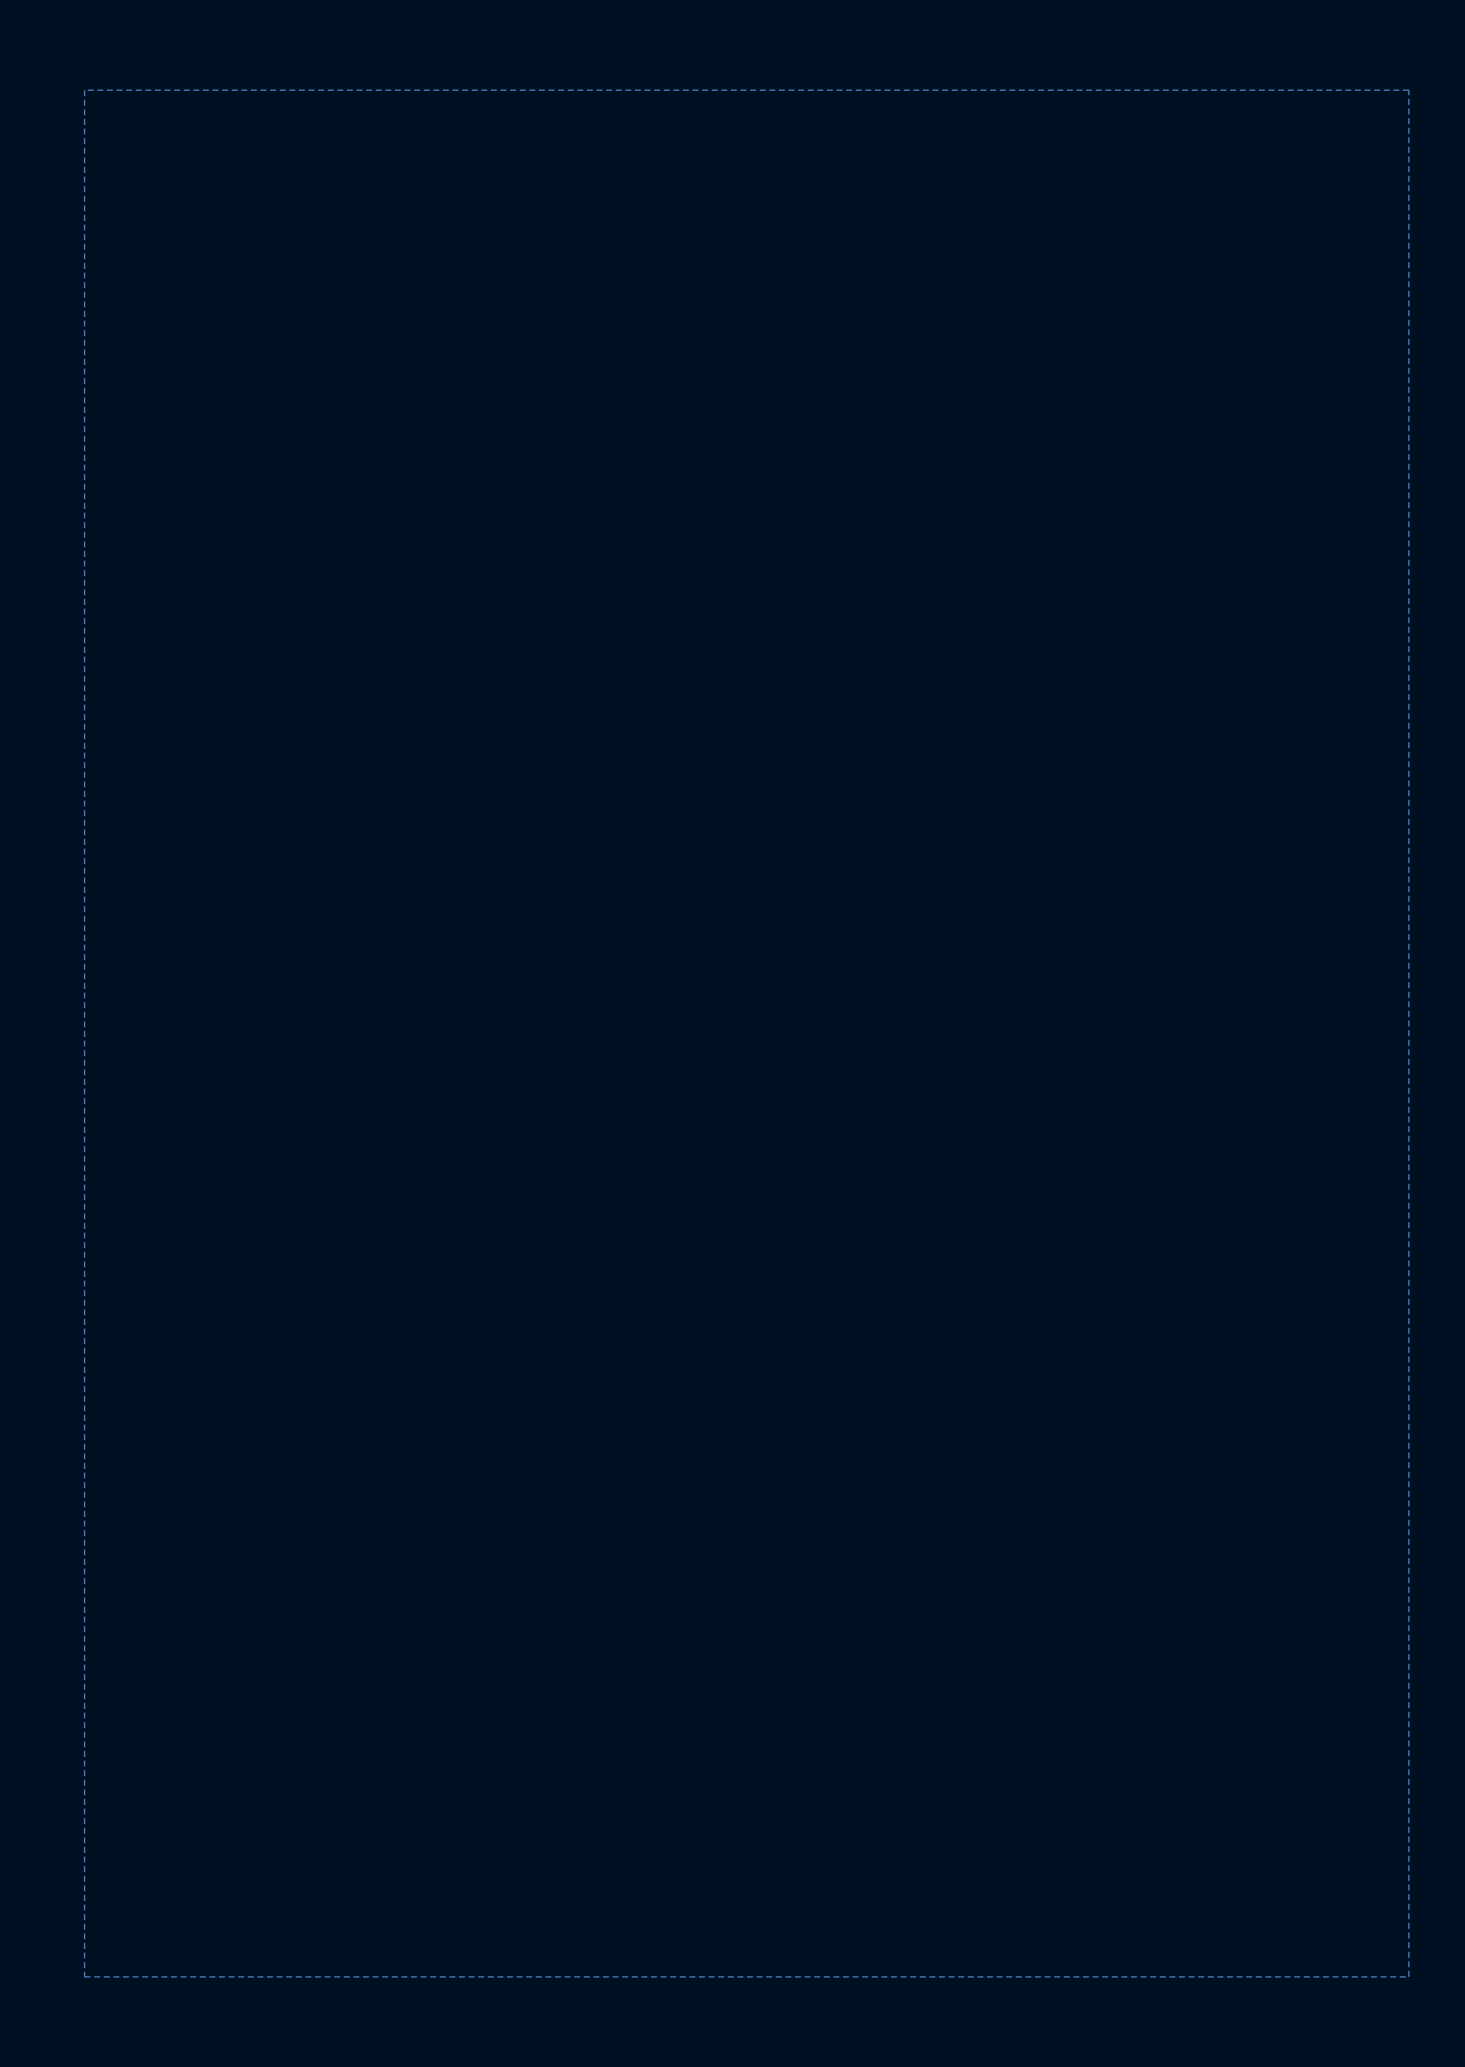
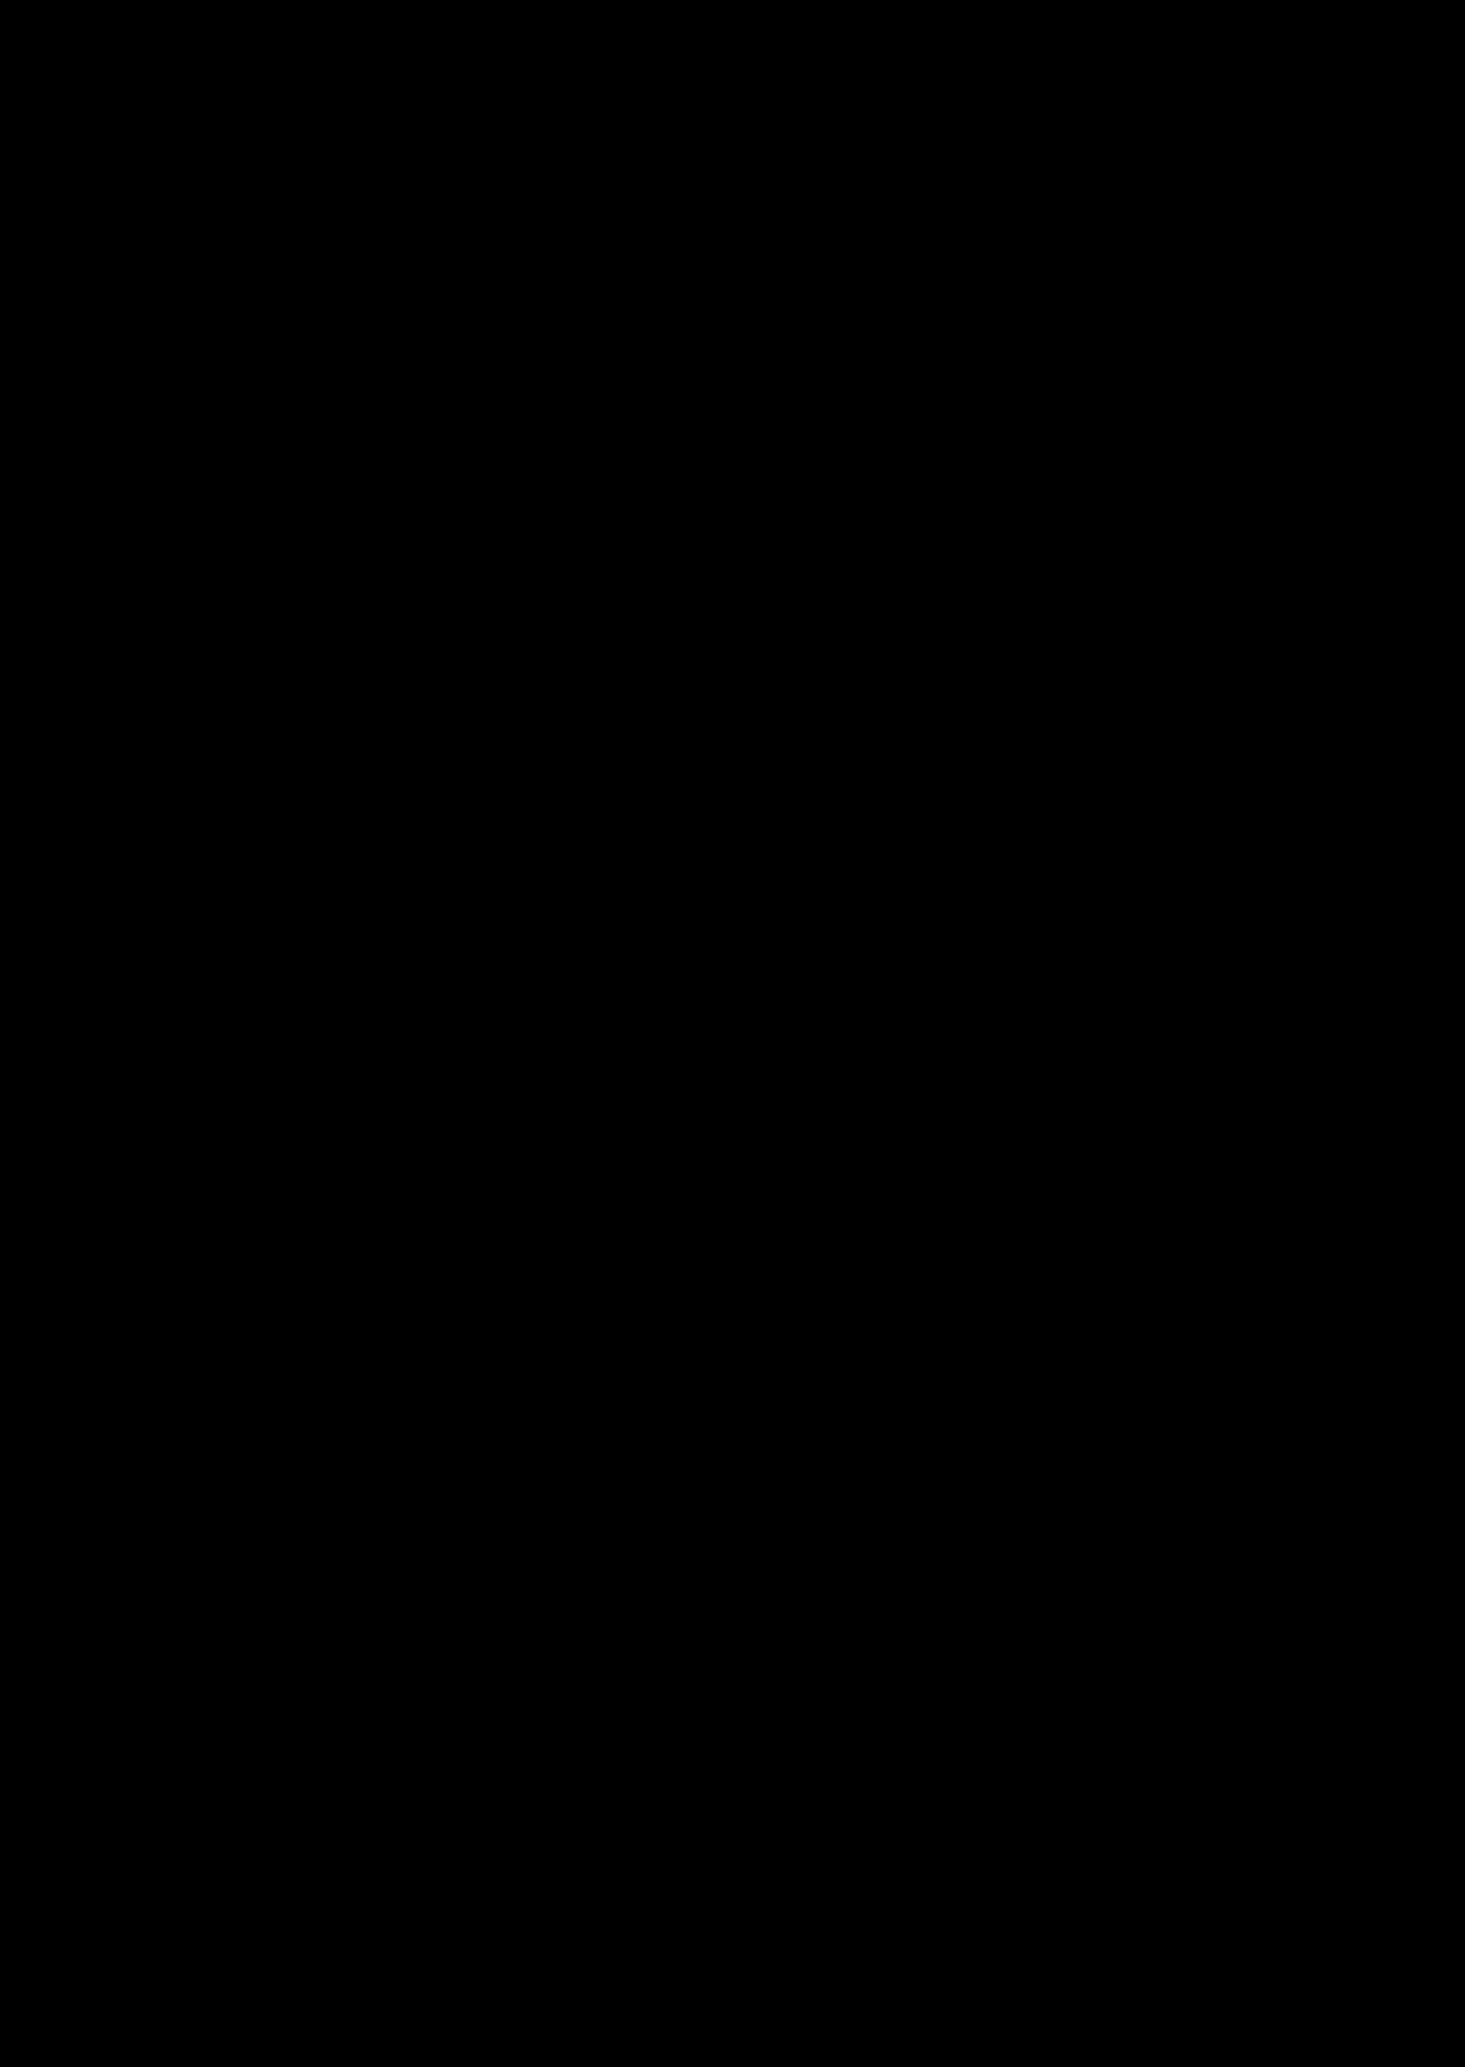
zone outline: (1408, 90) (1408, 1976) (84, 1976) (84, 90) (1408, 90) -> none

